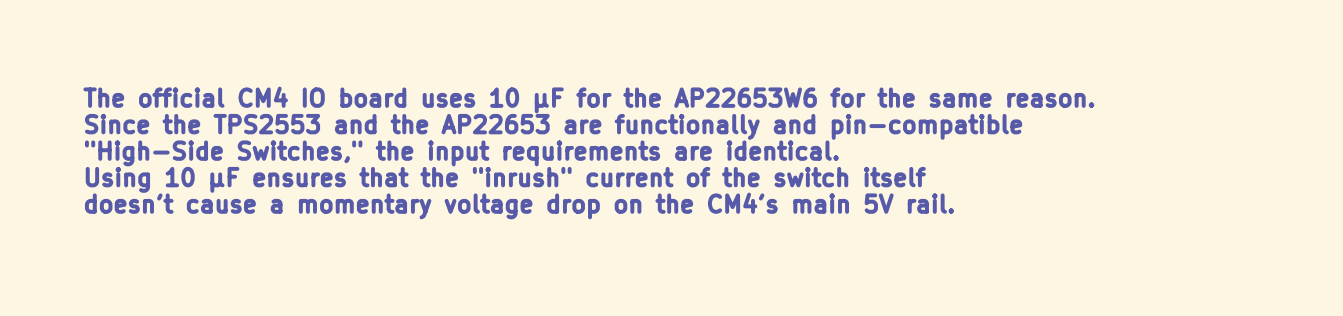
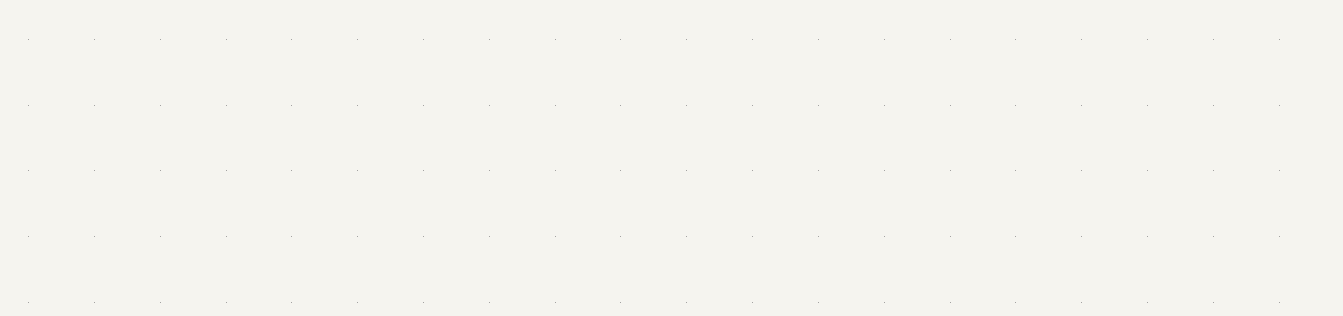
text: The official CM4 IO board uses 10 µF for the AP22653W6 for the same reason. (588, 99) -> none
text: Since the TPS2553 and the AP22653 are functionally and pin-compatible (553, 126) -> none
text: "High-Side Switches," the input requirements are identical. (461, 153) -> none
text: Using 10 µF ensures that the "inrush" current of the switch itself (505, 179) -> none
text: doesn't cause a momentary voltage drop on the CM4's main 5V rail. (519, 205) -> none

